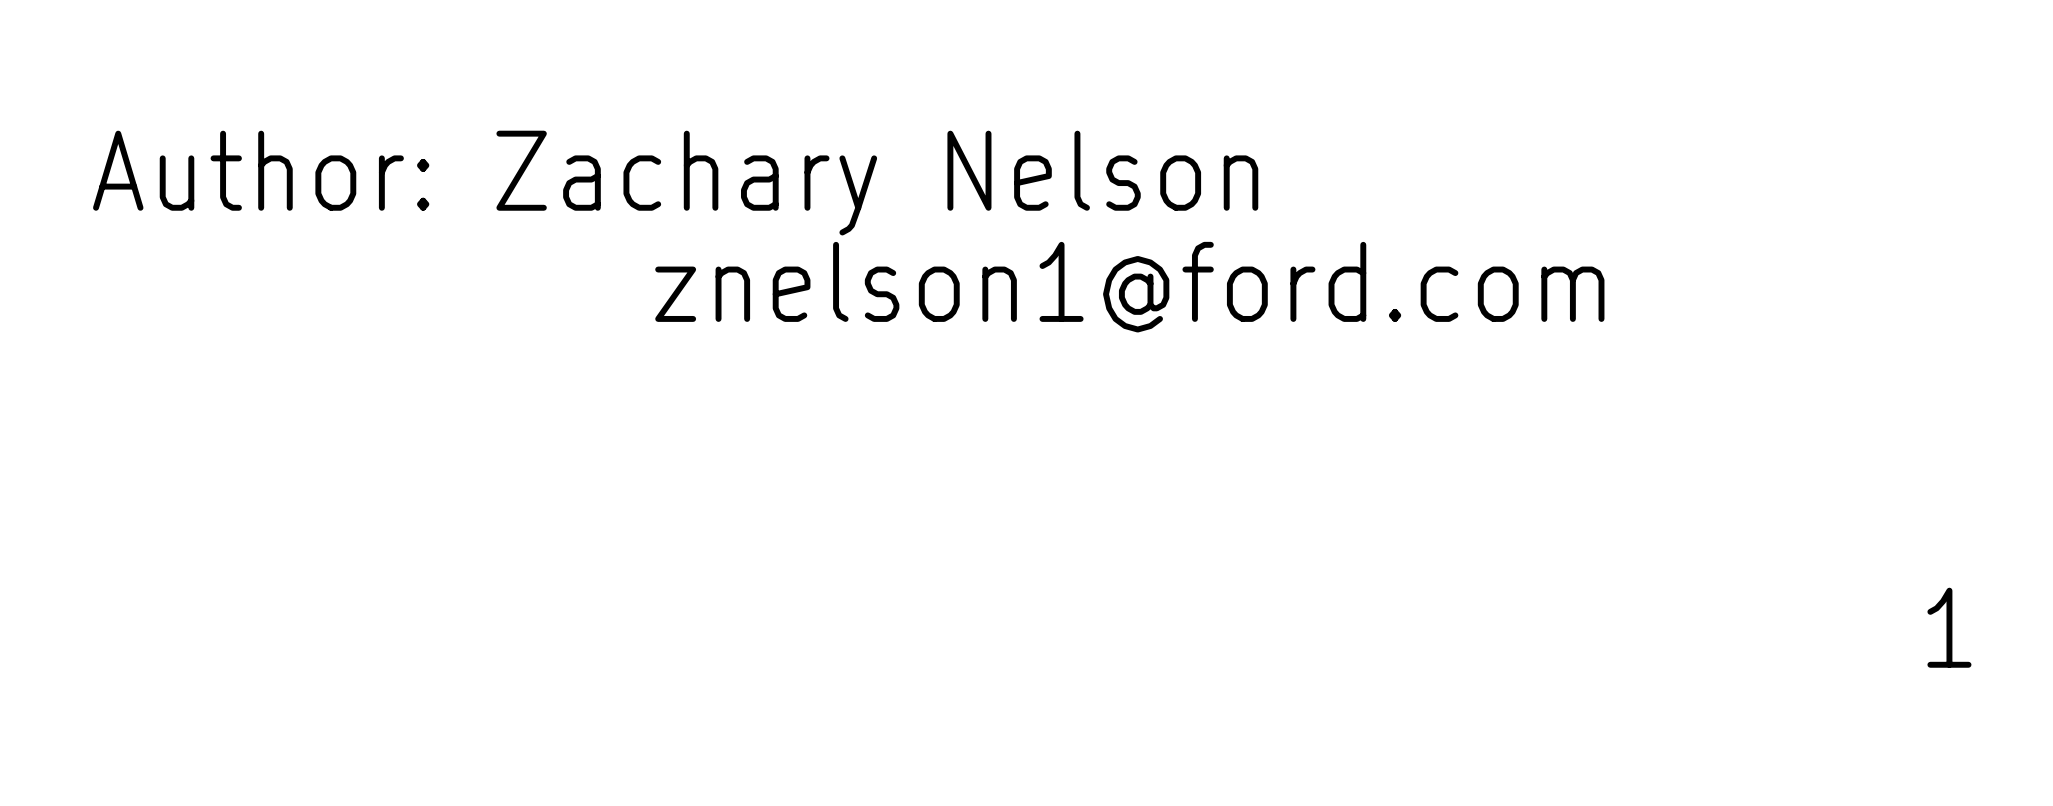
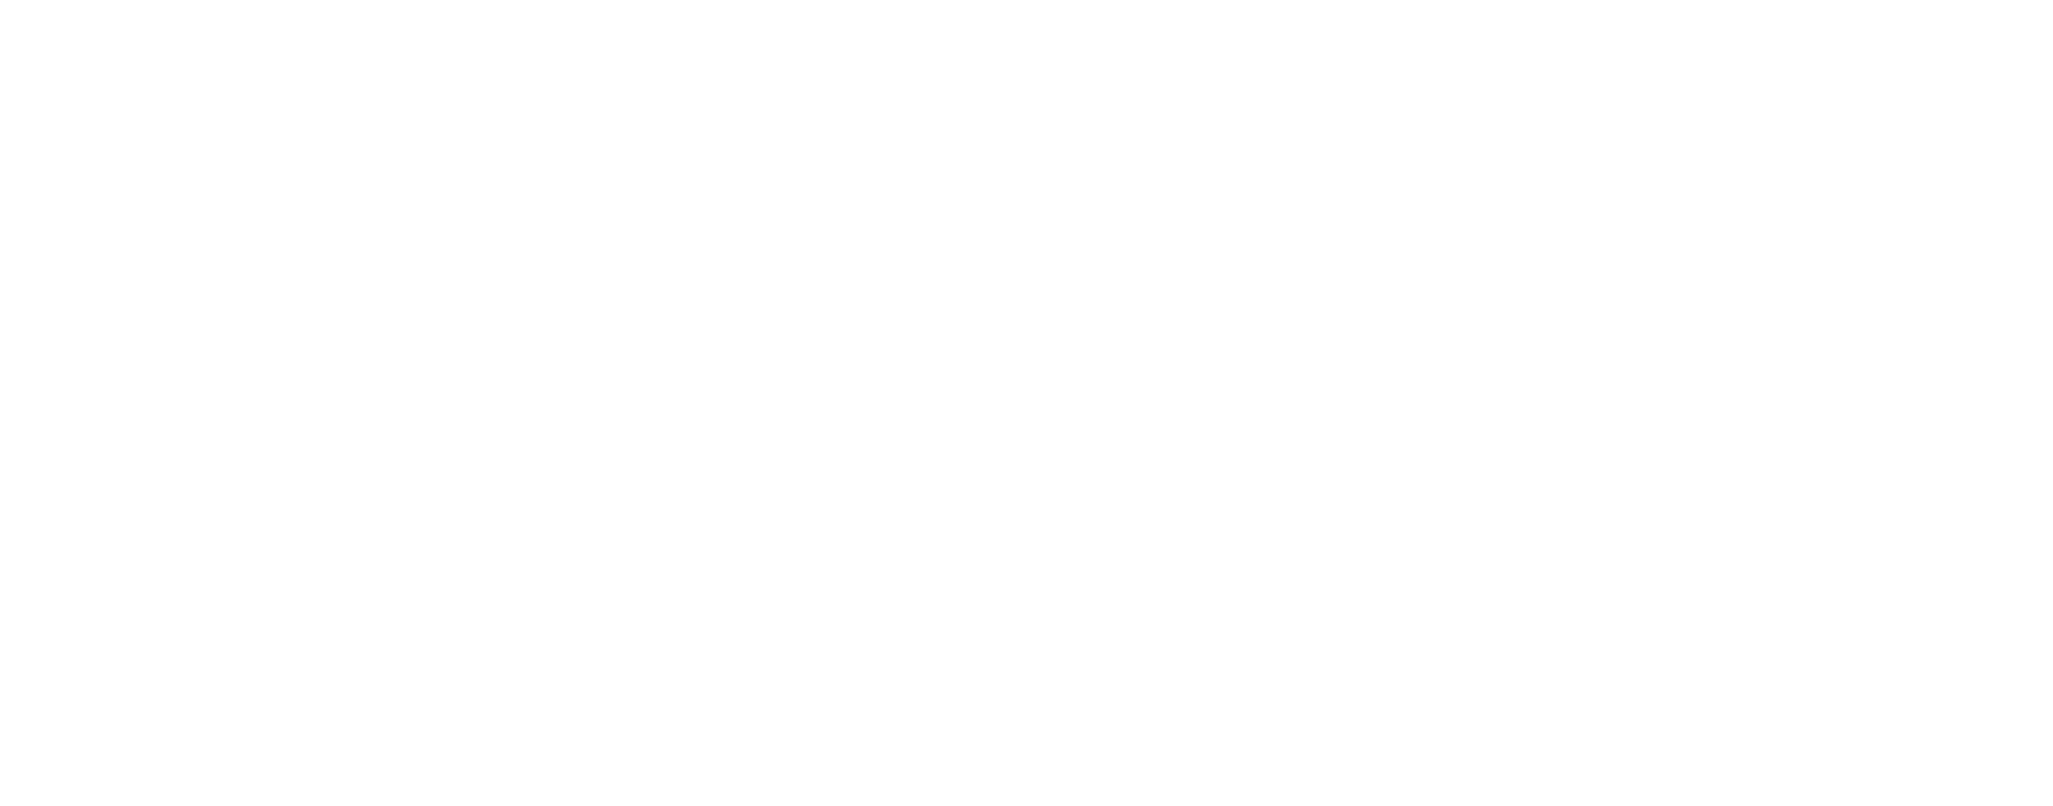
text: Author: Zachary Nelson (675, 183) -> none
text: znelson1@ford.com (1129, 287) -> none
text: 1 (1949, 627) -> none

